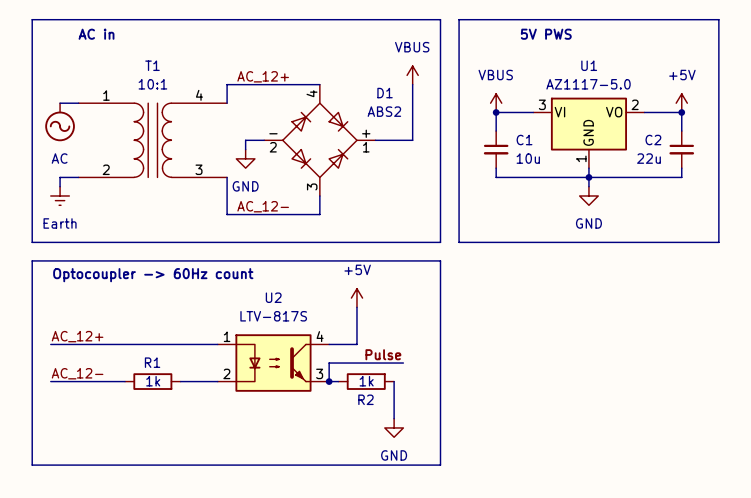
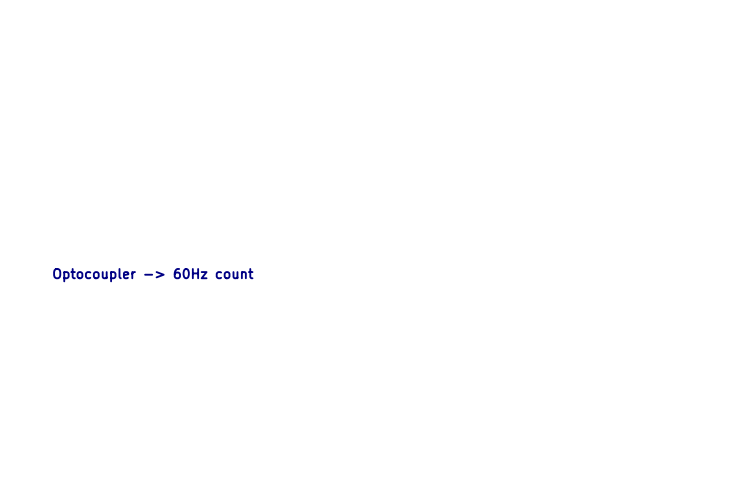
line: (32, 19) (32, 242) (440, 242) (440, 19) (32, 19) -> none
line: (459, 19) (718, 19) (718, 242) (459, 242) (459, 19) -> none
text: AC in (96, 34) -> none
text: 5V PWS (546, 34) -> none
power symbol: VBUS (412, 75) -> none
label: AC_12+ (263, 76) -> none
wire: (319, 84) (227, 84) (227, 103) -> none
wire: (412, 84) (412, 140) (375, 140) -> none
wire: (60, 103) (78, 103) -> none
power symbol: VBUS (496, 103) -> none
power symbol: +5V (681, 103) -> none
junction: (496, 112) -> none
wire: (533, 112) (496, 112) (496, 131) -> none
wire: (644, 112) (681, 112) (681, 131) -> none
junction: (681, 112) -> none
power symbol: AC (60, 122) -> none
U1: AZ1117-5.0 (588, 132) -> none
T1: 10:1 (152, 140) -> none
wire: (264, 140) (245, 140) (245, 149) -> none
D1: ABS2 (319, 140) -> none
C1: 10u (496, 149) -> none
C2: 22u (681, 149) -> none
power symbol: GND (245, 158) -> none
wire: (496, 168) (496, 177) (681, 177) (681, 168) -> none
wire: (588, 168) (588, 186) -> none
wire: (78, 177) (60, 177) (60, 186) -> none
wire: (227, 177) (227, 214) (319, 214) (319, 195) -> none
junction: (588, 177) -> none
power symbol: Earth (60, 195) -> none
power symbol: GND (588, 195) -> none
label: AC_12- (263, 206) -> none
line: (32, 260) (440, 260) (440, 465) (32, 465) (32, 260) -> none
power symbol: +5V (356, 298) -> none
wire: (356, 307) (356, 344) (329, 344) -> none
label: AC_12+ (77, 336) -> none
wire: (50, 344) (217, 344) -> none
label: Pulse (383, 354) -> none
U2: LTV-817S (273, 363) -> none
wire: (403, 363) (329, 363) (329, 381) (338, 381) -> none
label: AC_12- (77, 373) -> none
wire: (50, 381) (125, 381) -> none
R1: 1k (152, 381) -> none
wire: (180, 381) (217, 381) -> none
junction: (329, 381) -> none
R2: 1k (366, 381) -> none
wire: (394, 381) (394, 418) -> none
power symbol: GND (394, 427) -> none

